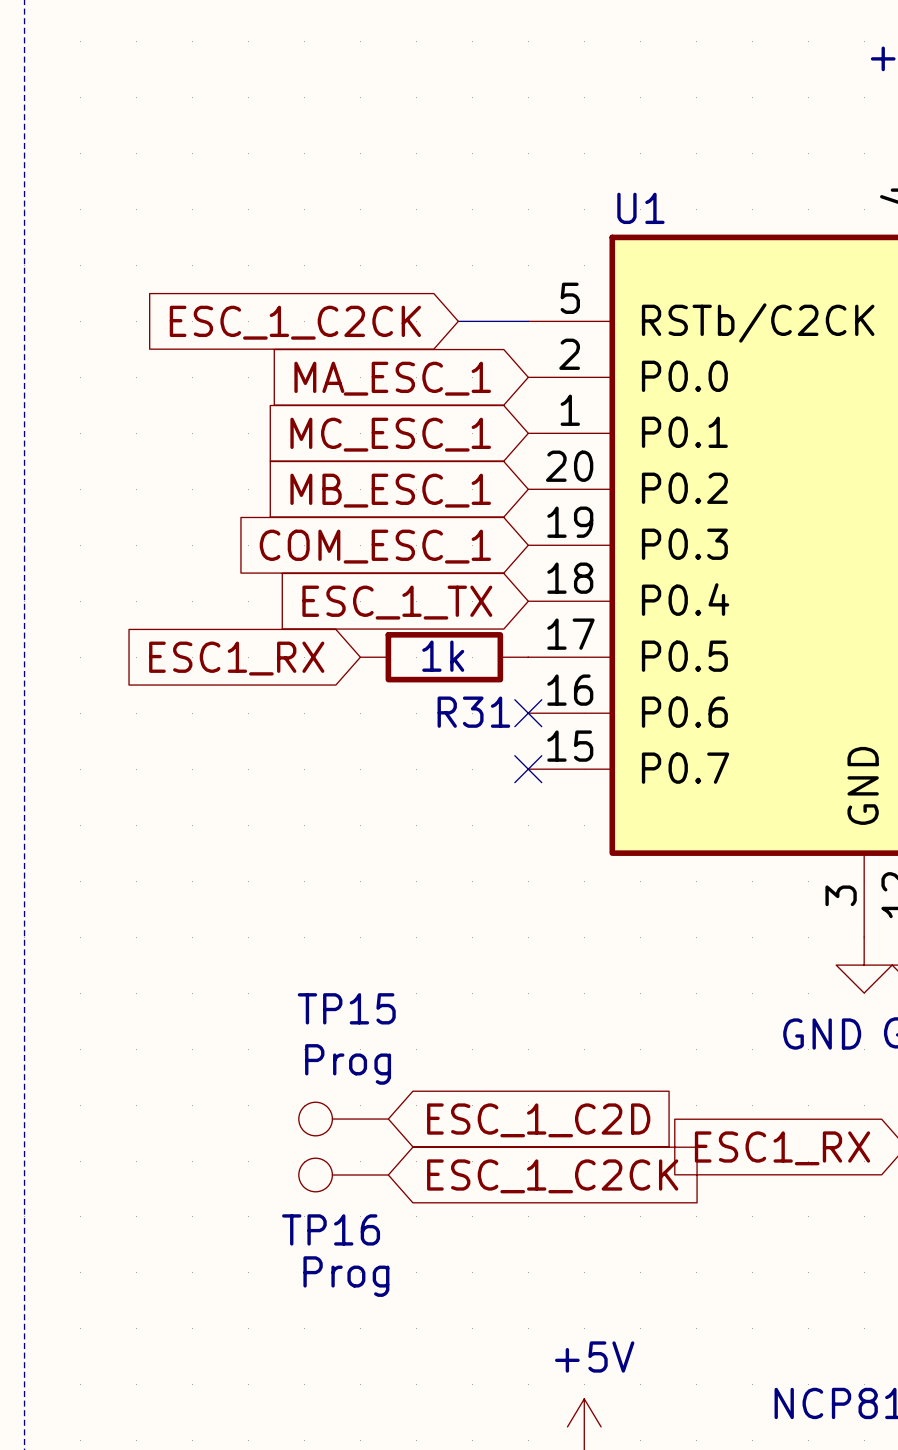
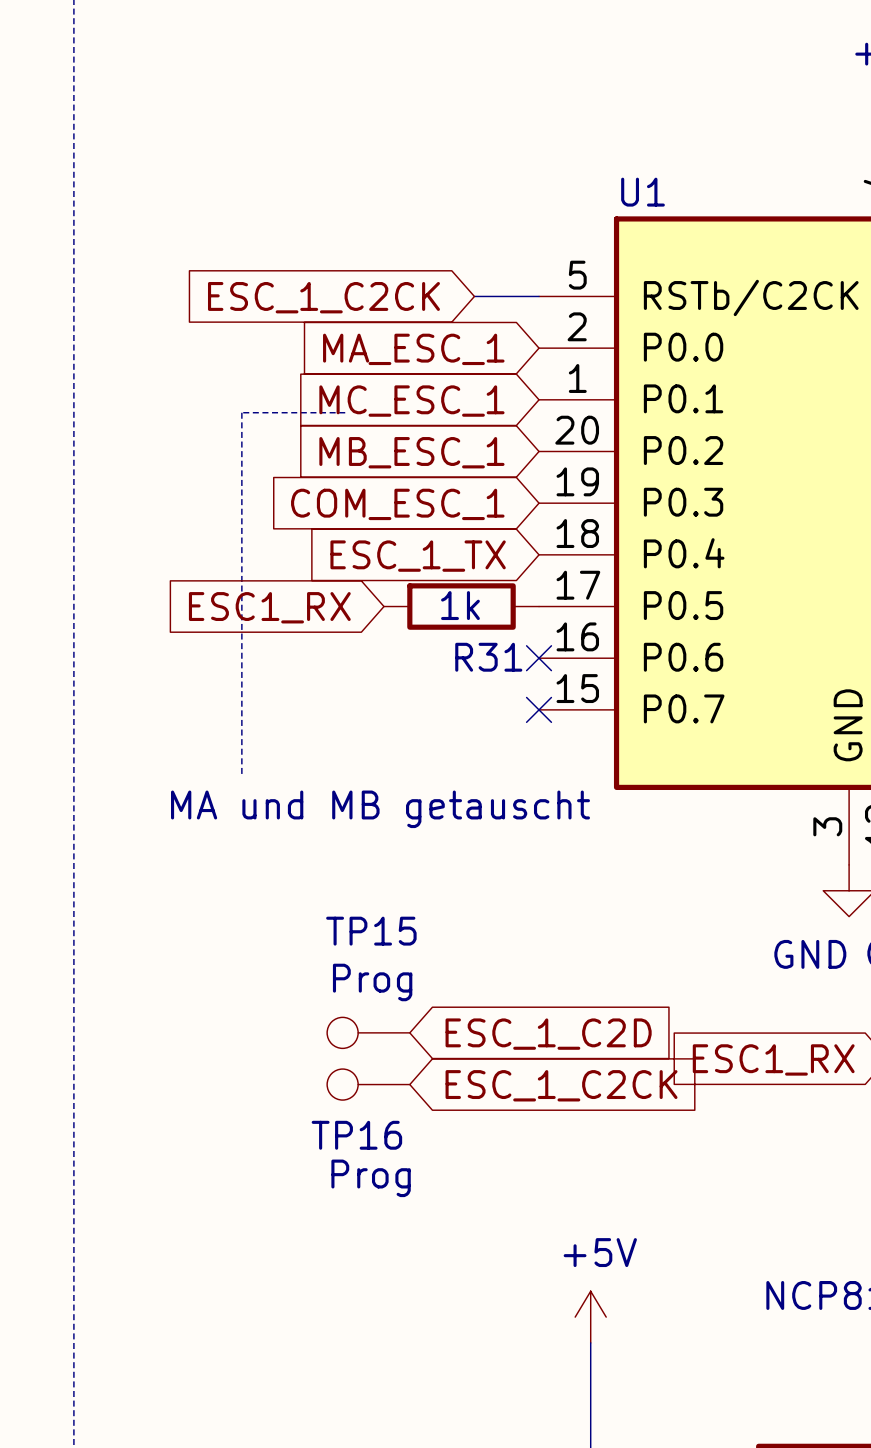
line: none -> (345, 412) (241, 412) (241, 774)
text: none -> MA und MB getauscht (380, 809)

